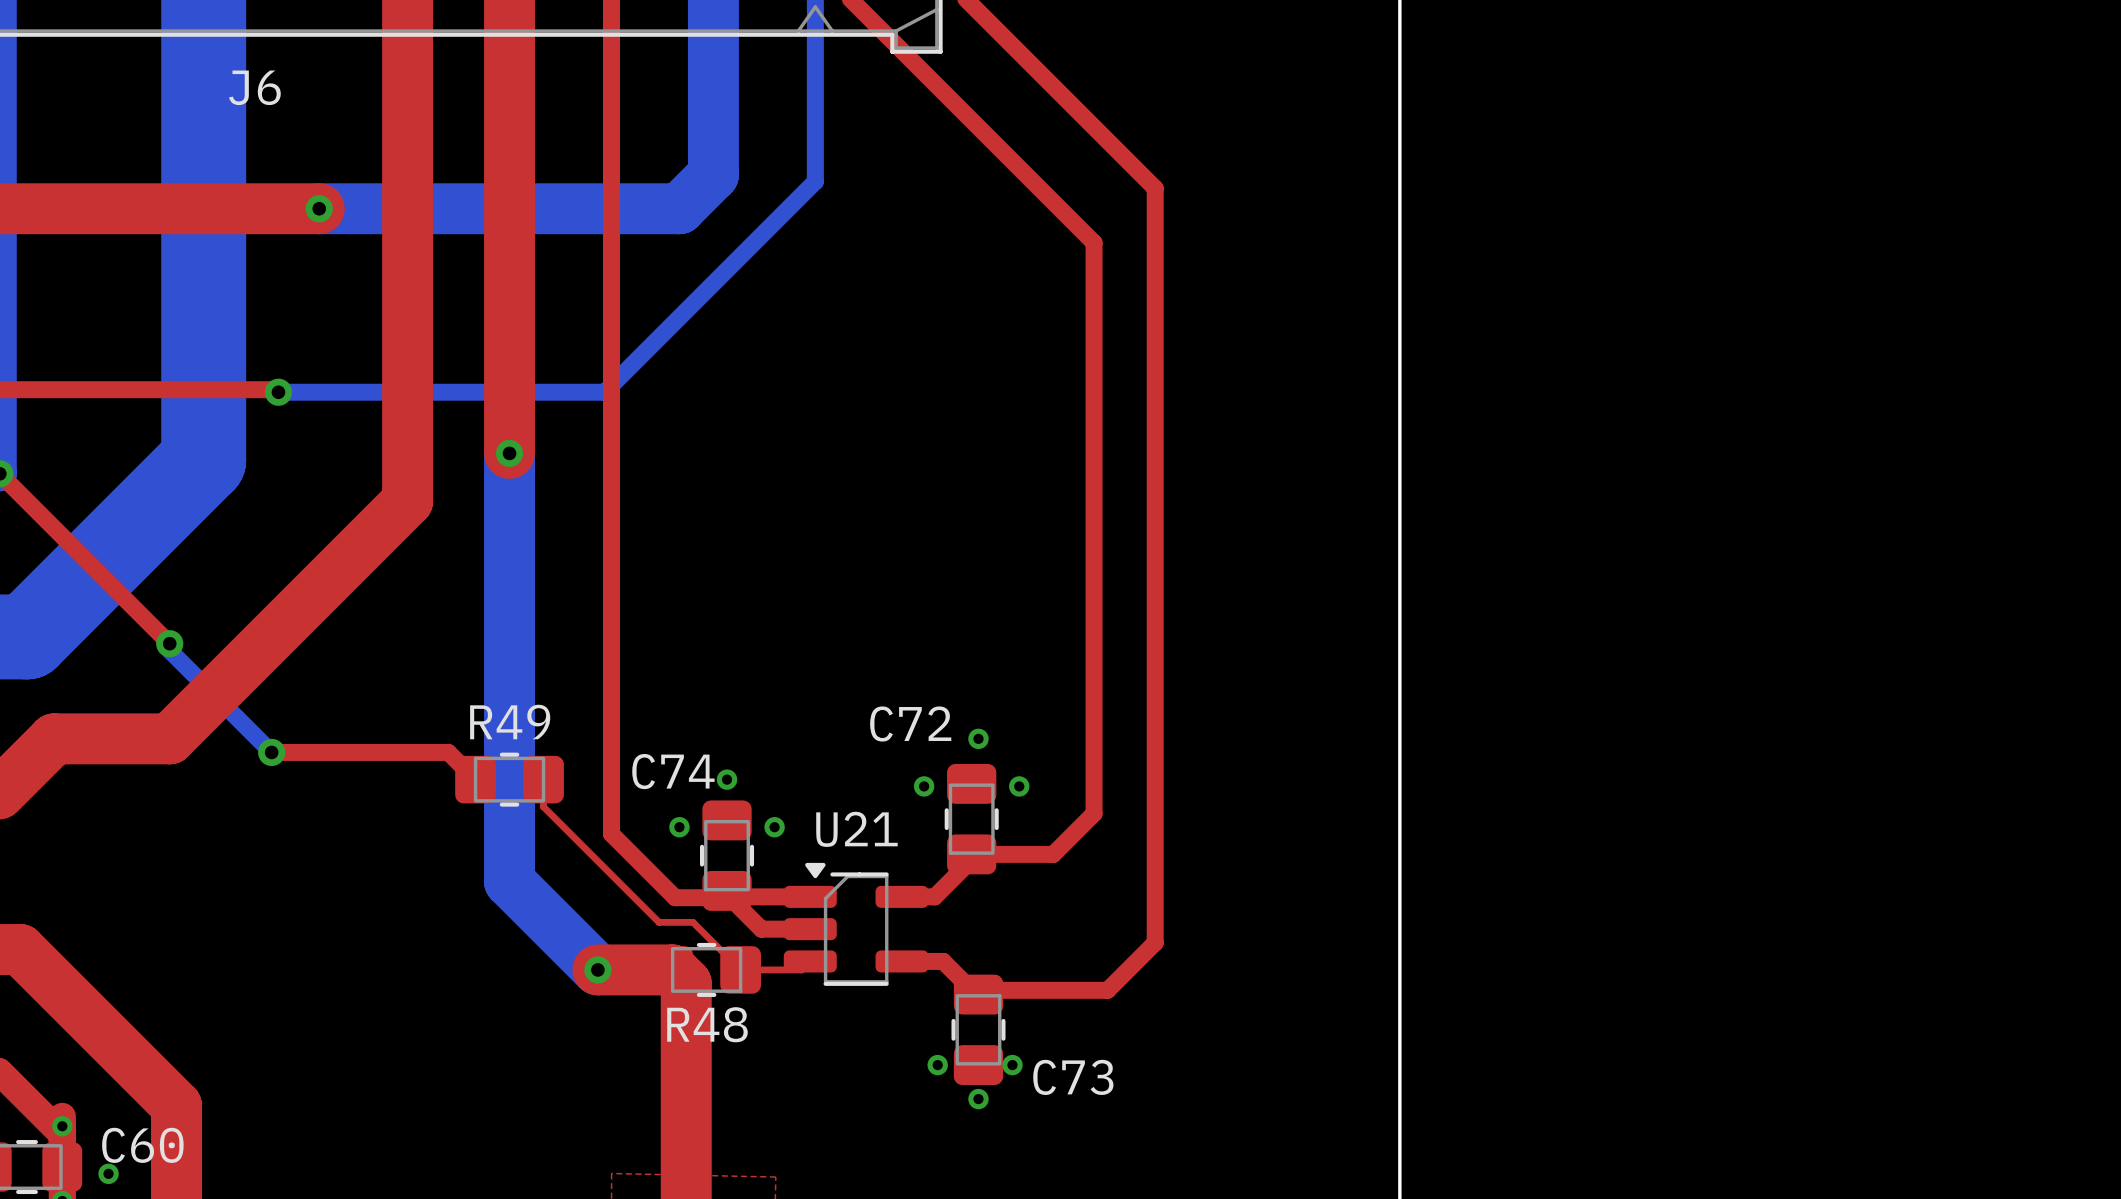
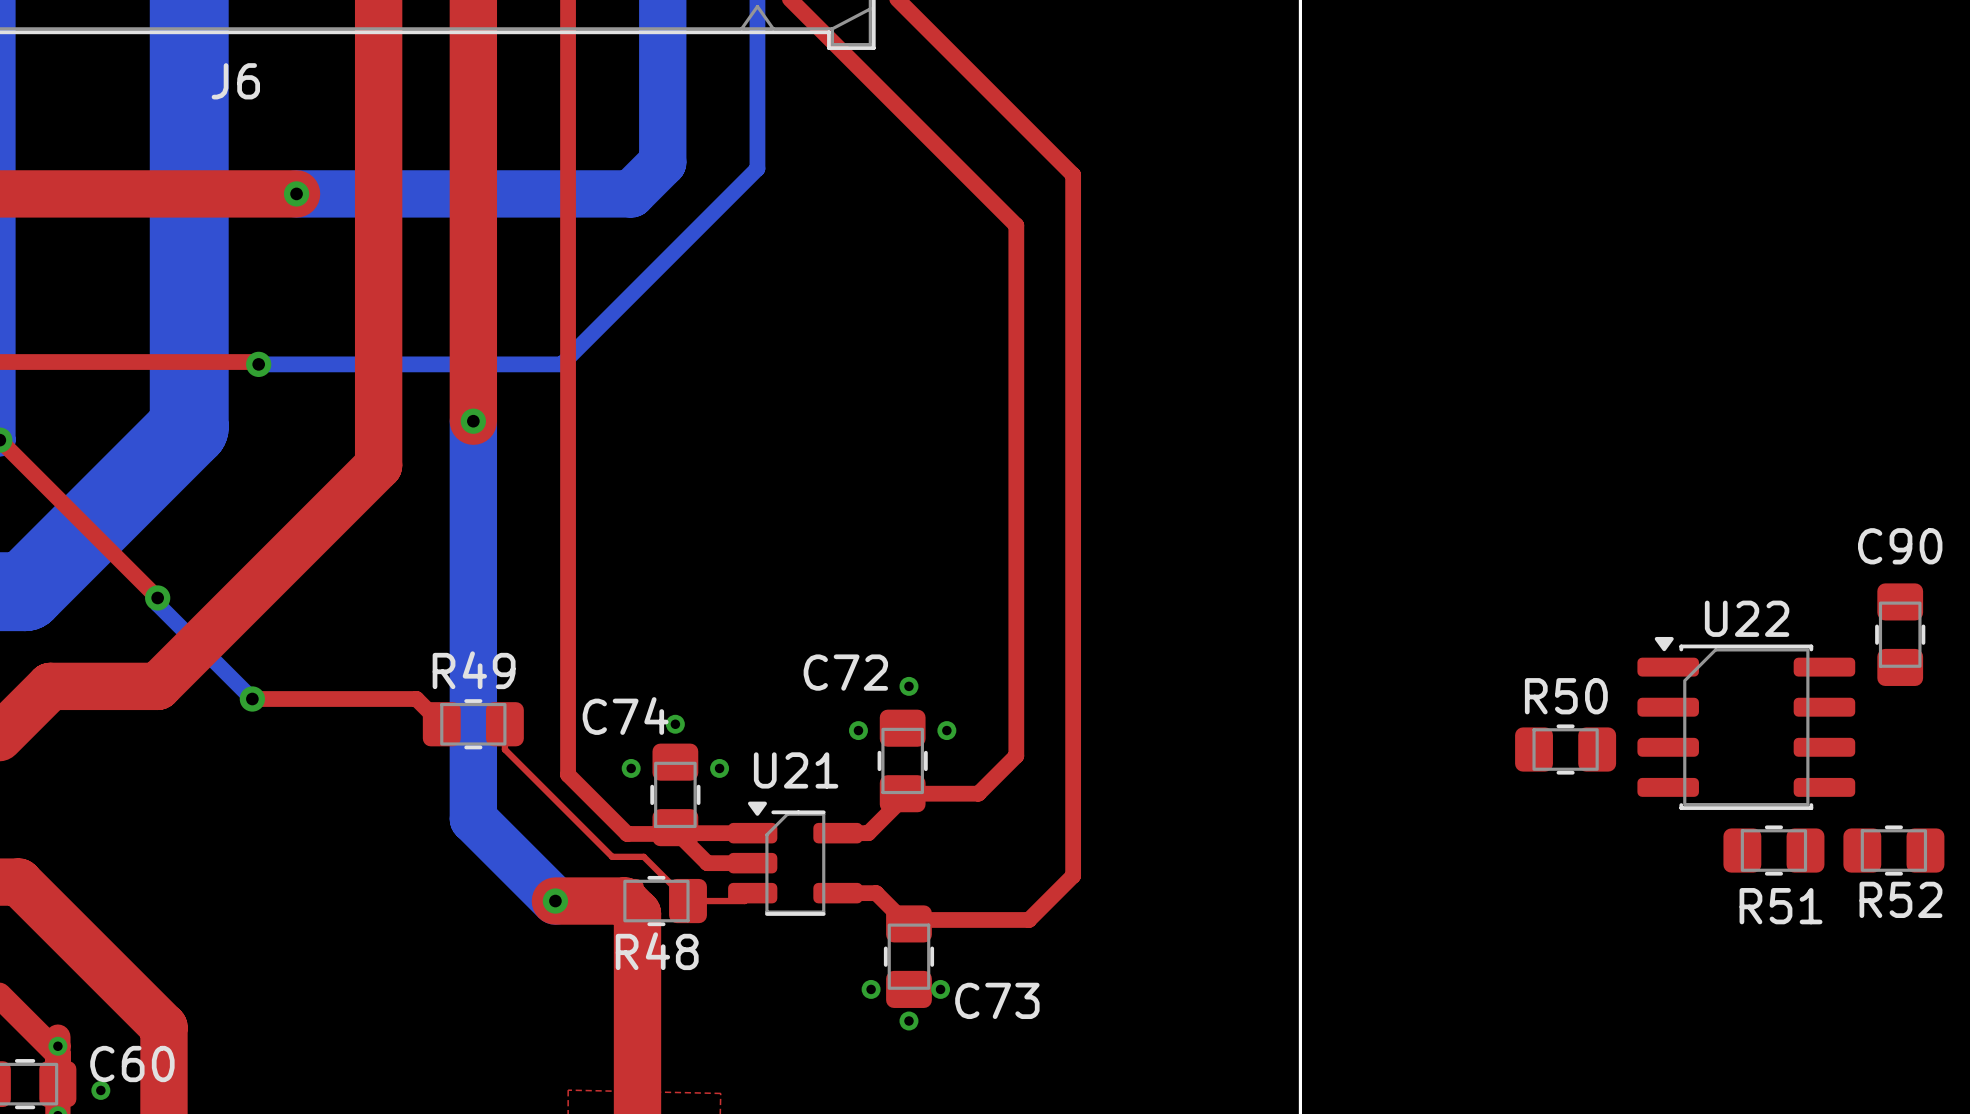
C90: none -> (1900, 634)
U22: none -> (1746, 723)
R50: none -> (1565, 749)
R51: none -> (1773, 850)
R52: none -> (1893, 850)

